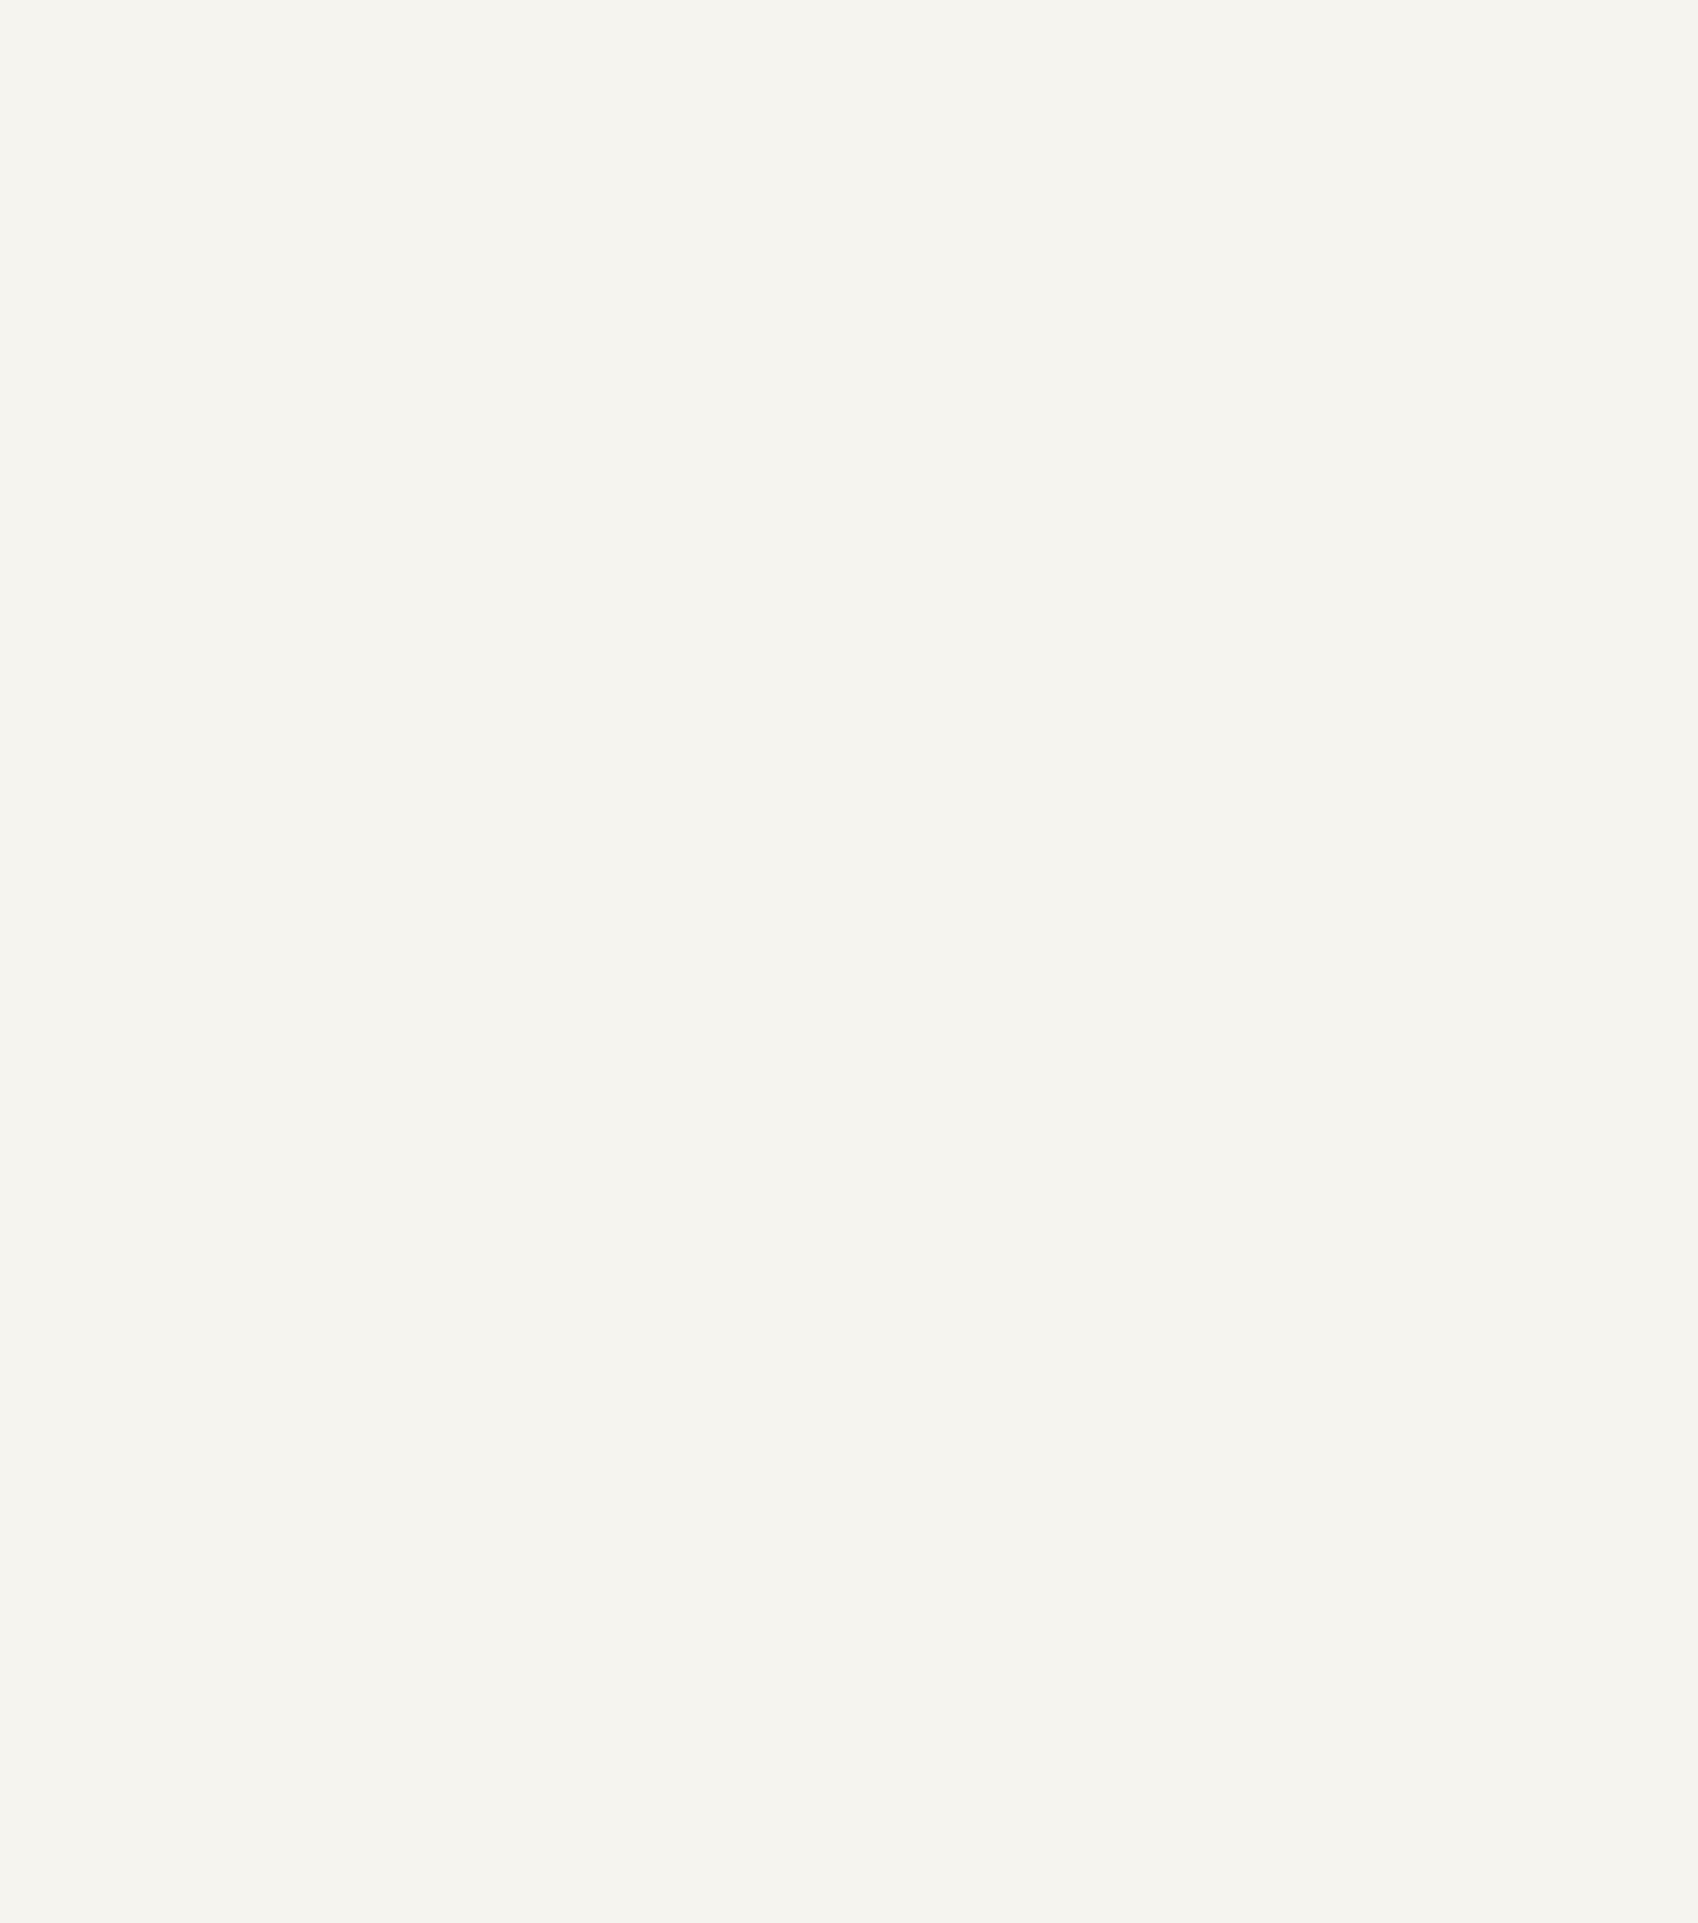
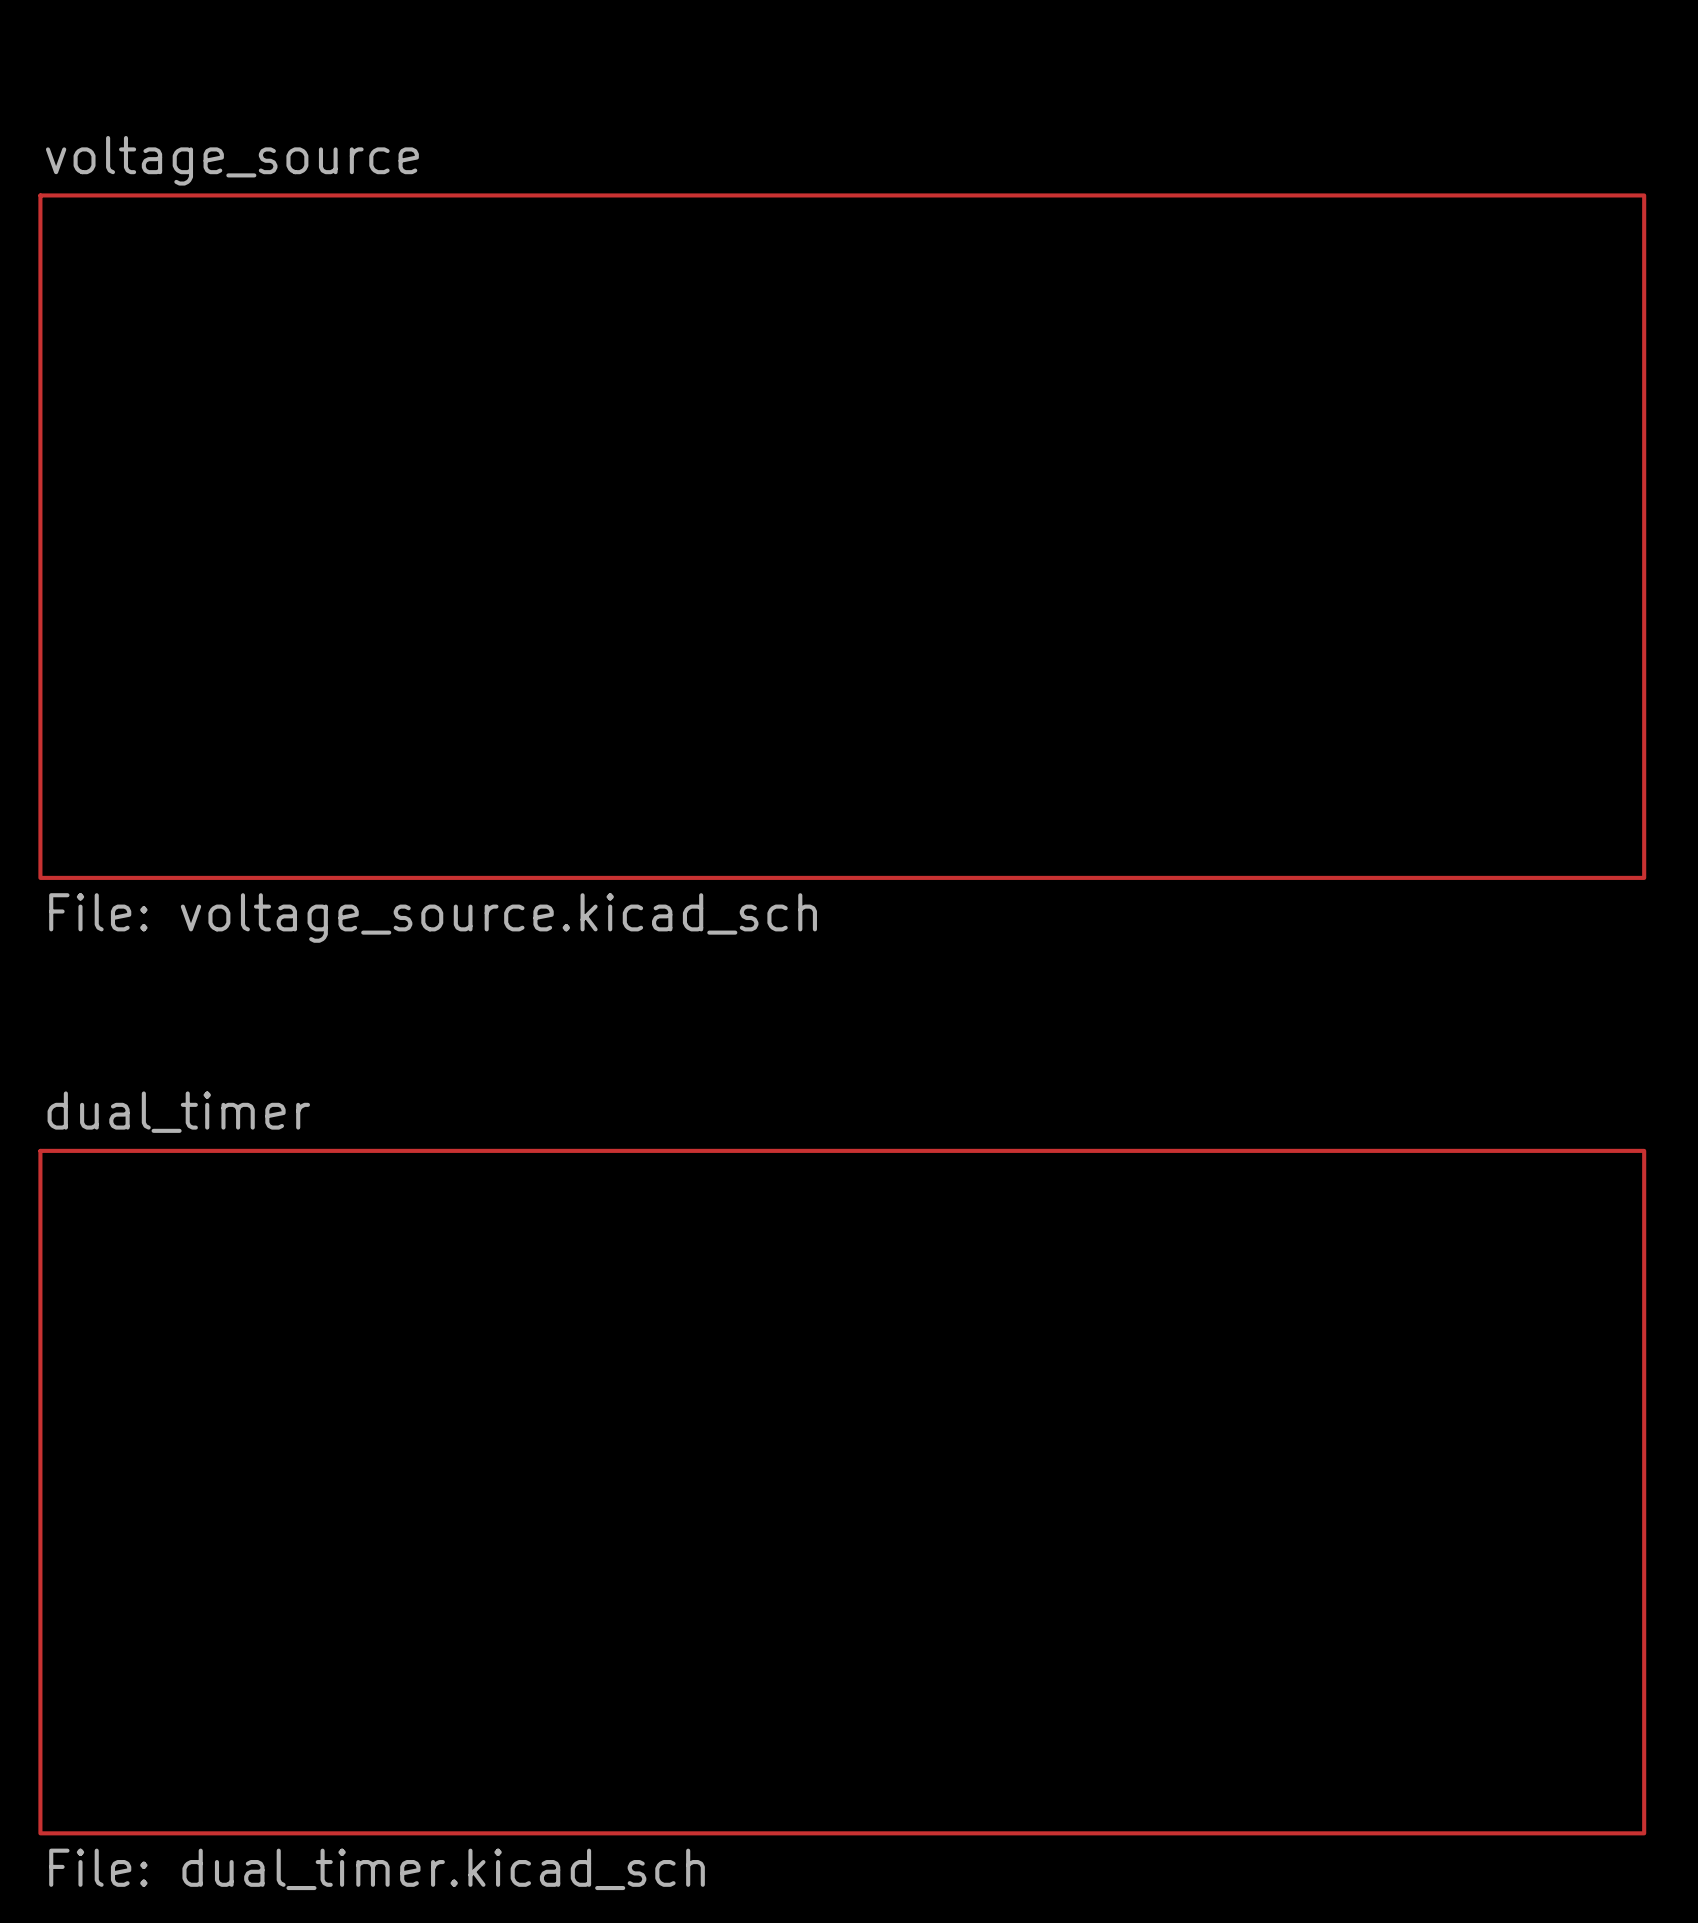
sheet voltage_source: none -> File: voltage_source.kicad_sch (842, 536)
sheet dual_timer: none -> File: dual_timer.kicad_sch (842, 1492)

